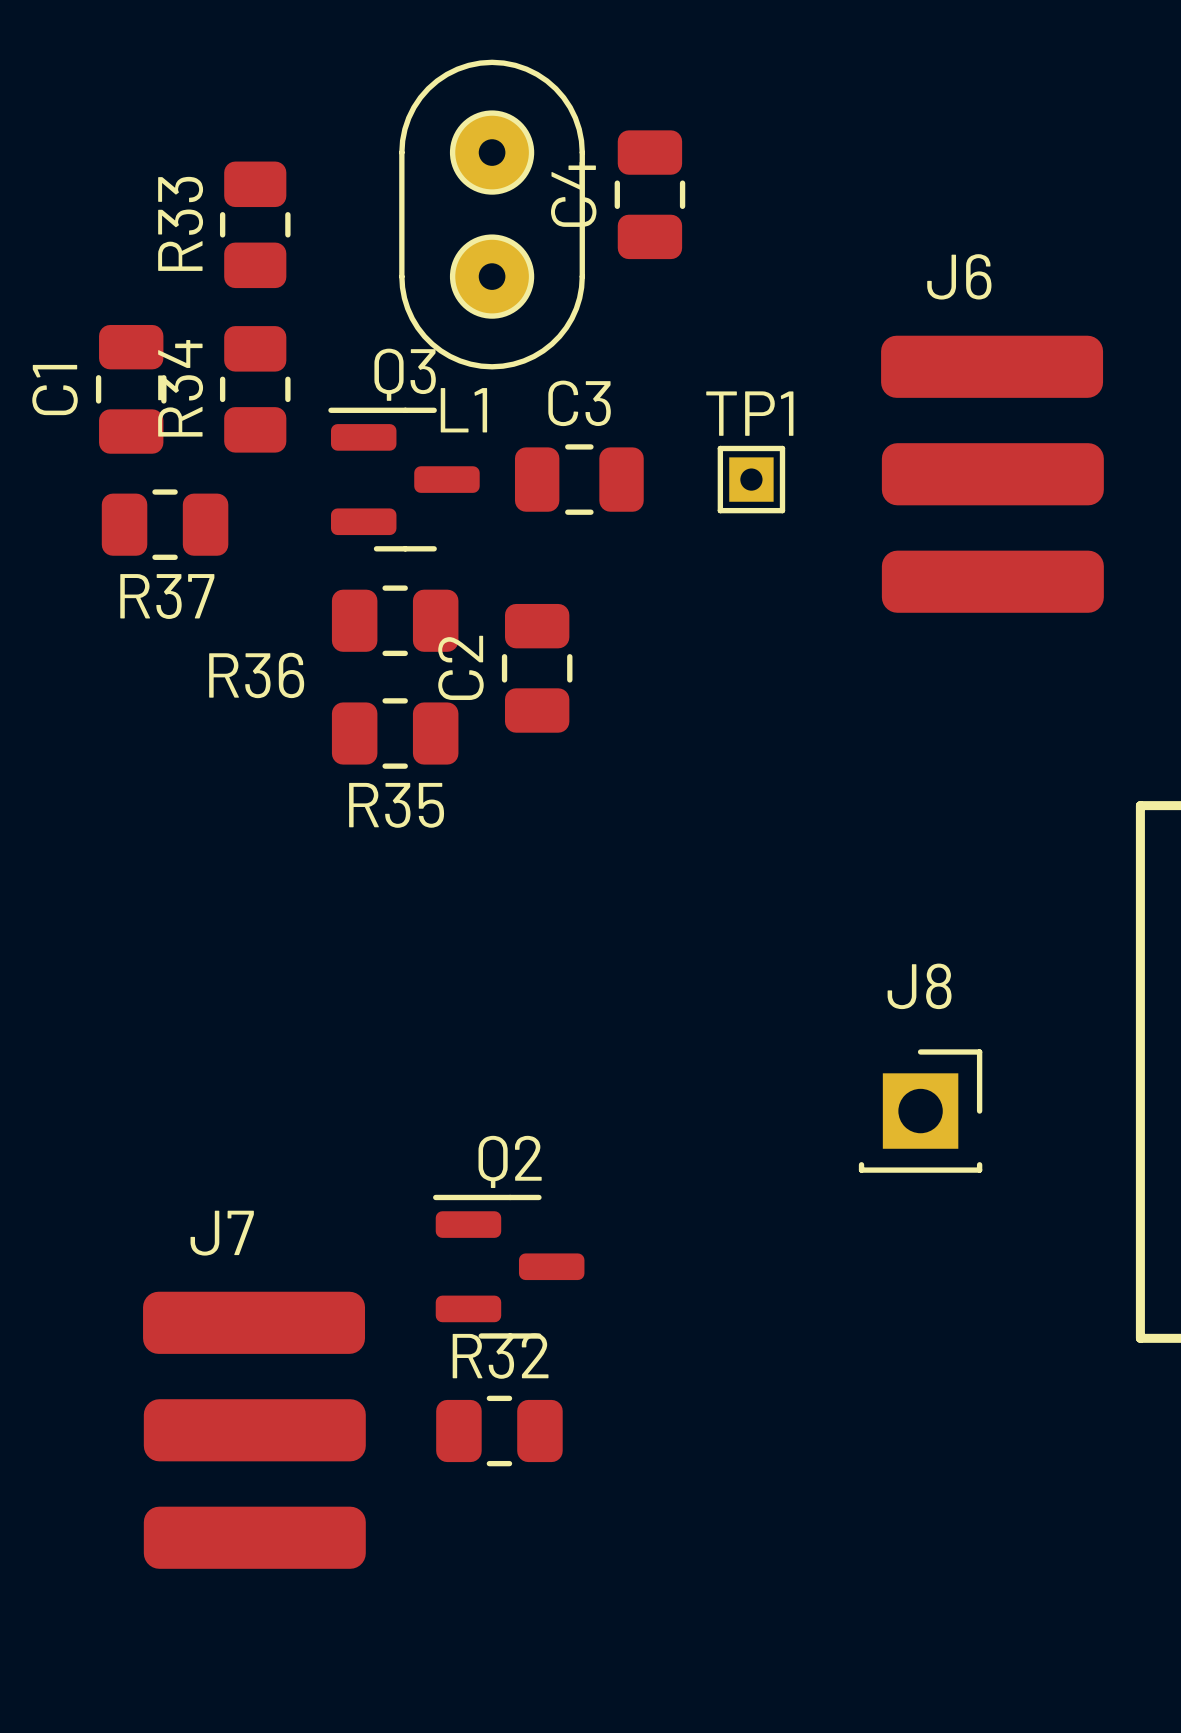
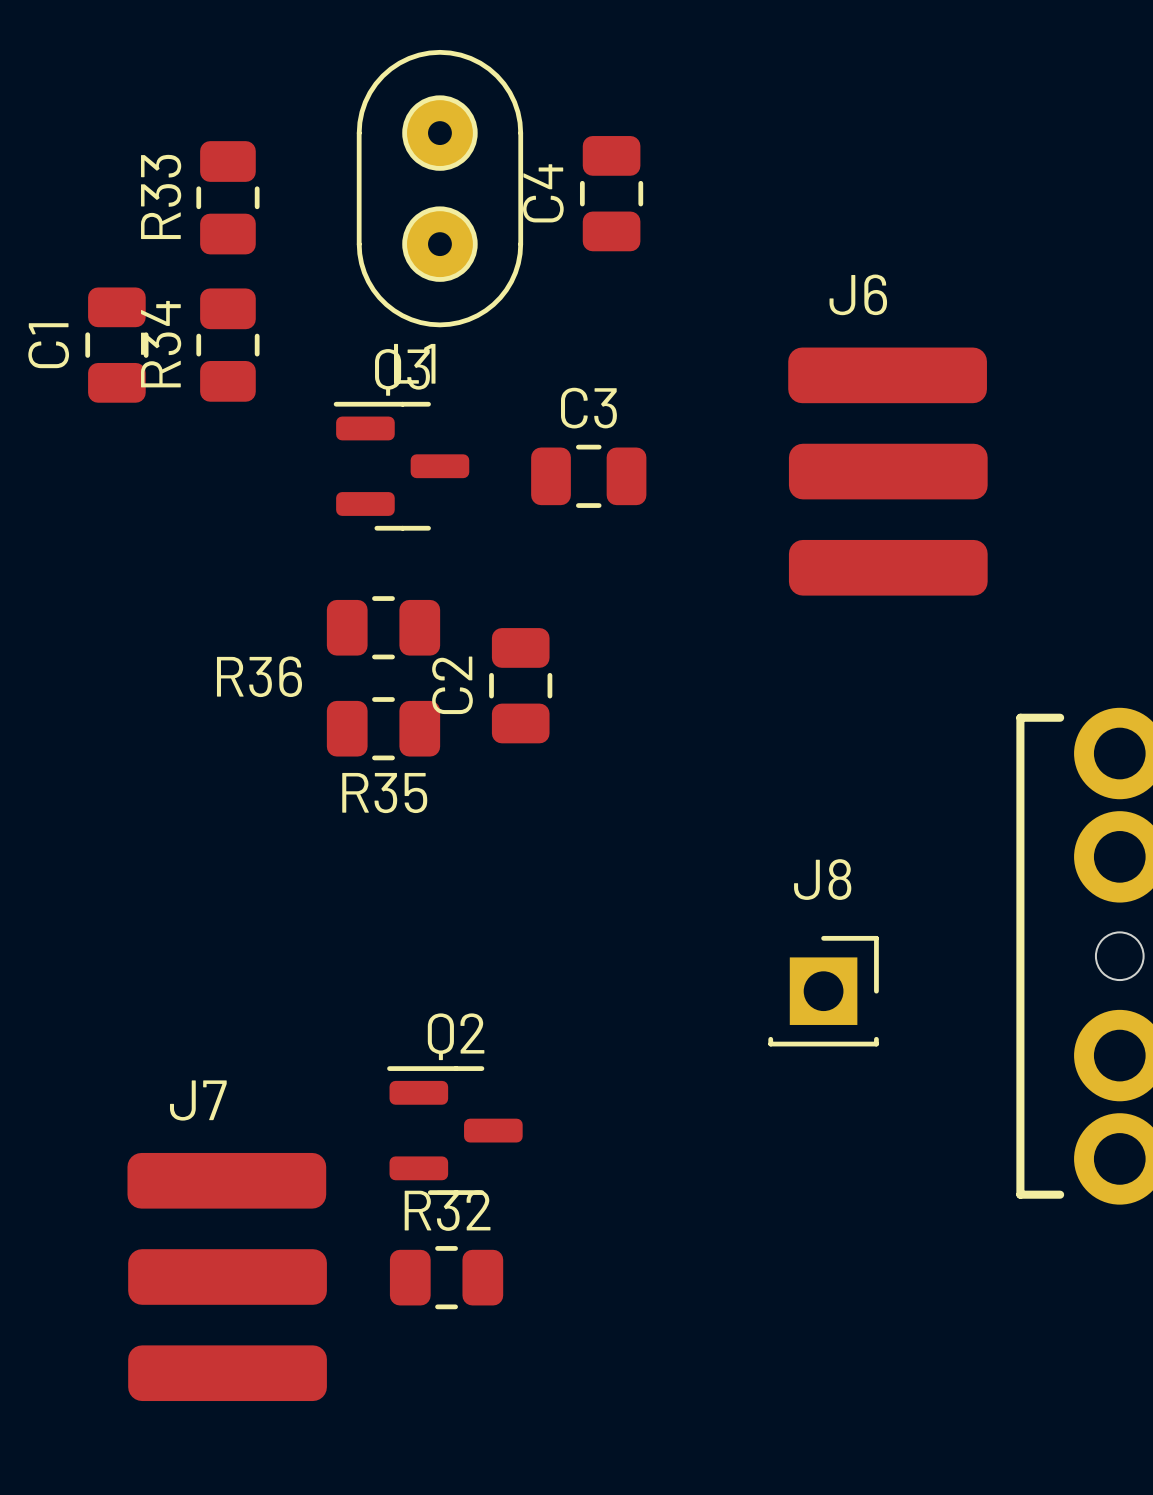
C4 position: (649, 194) -> (611, 193)
J6 position: (992, 474) -> (887, 471)
Q3 position: (404, 479) -> (401, 466)
C3 position: (579, 479) -> (588, 476)
TP1: (751, 479) -> none
R37: (165, 524) -> none
R36 position: (395, 620) -> (383, 627)
C2 position: (537, 668) -> (520, 685)
R35 position: (395, 733) -> (383, 728)

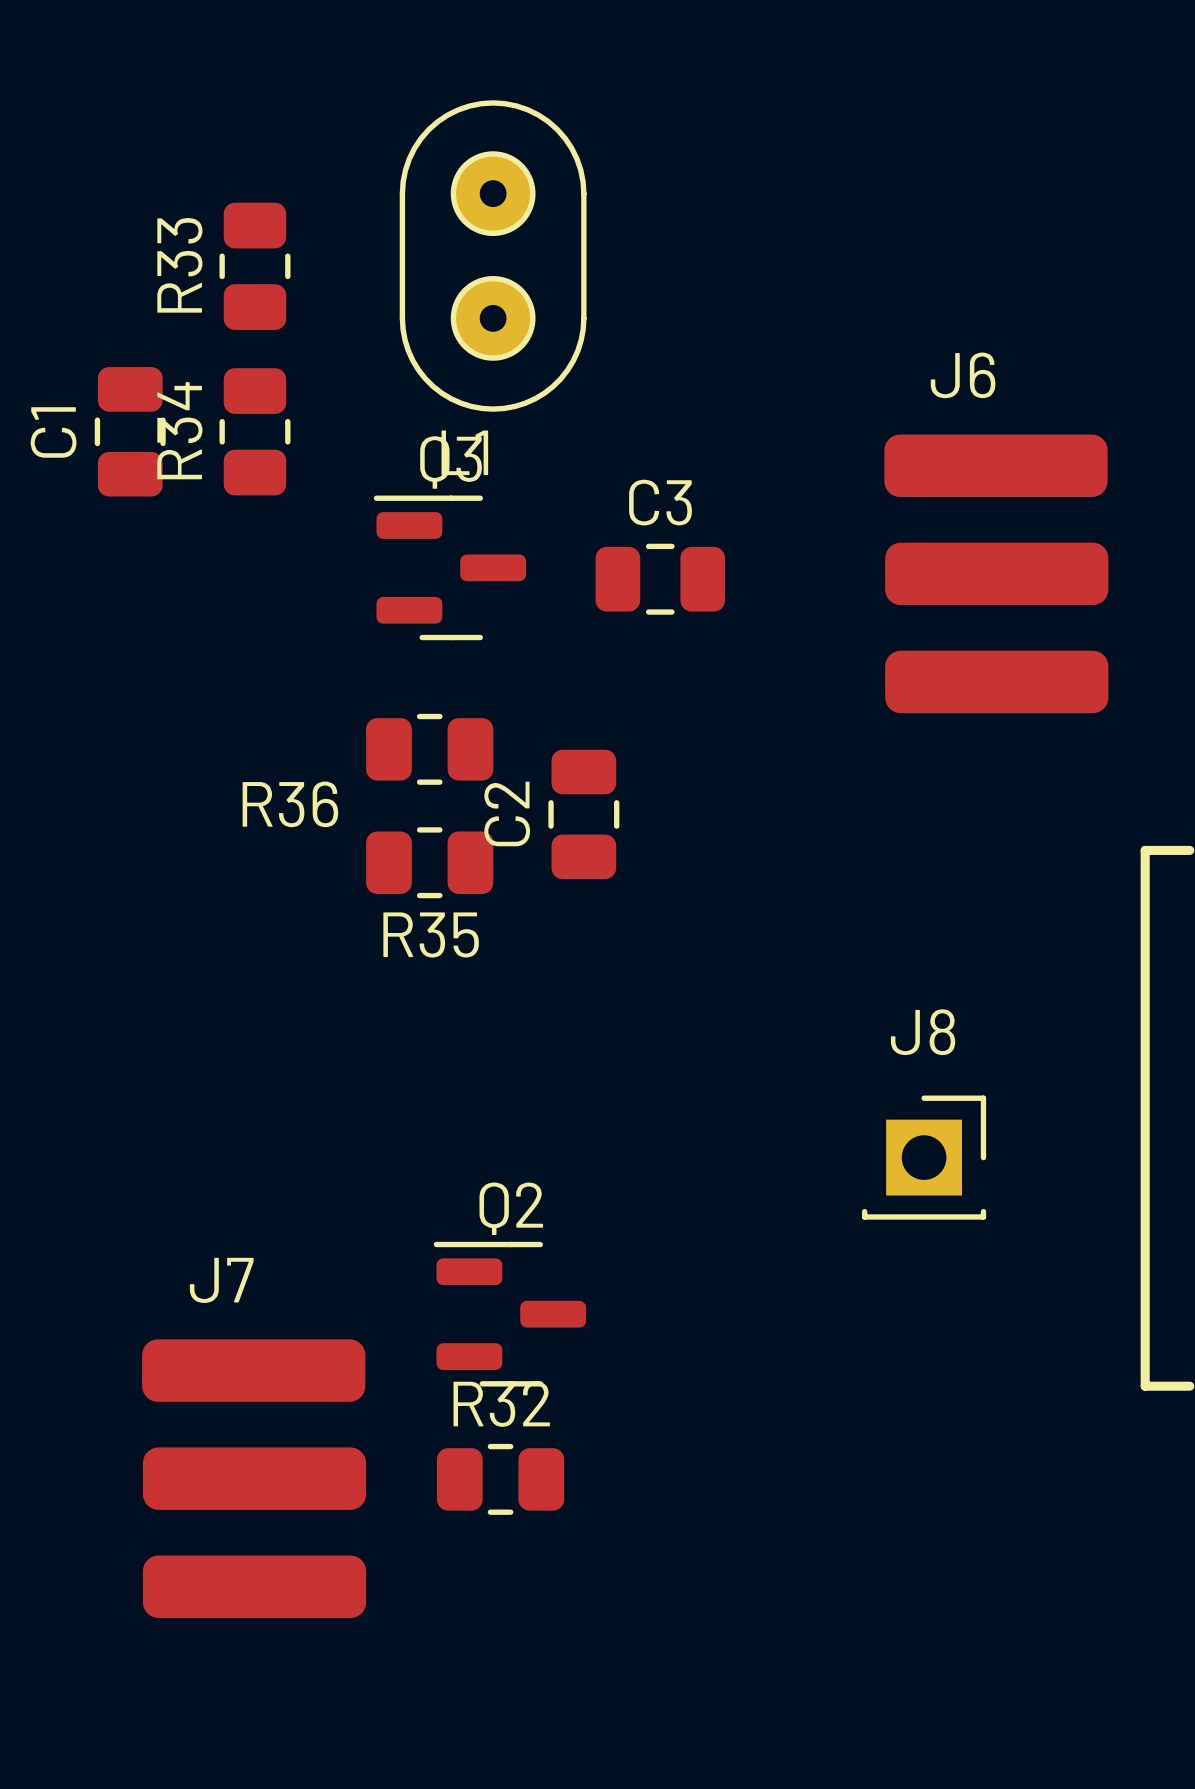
C4: (611, 193) -> none

